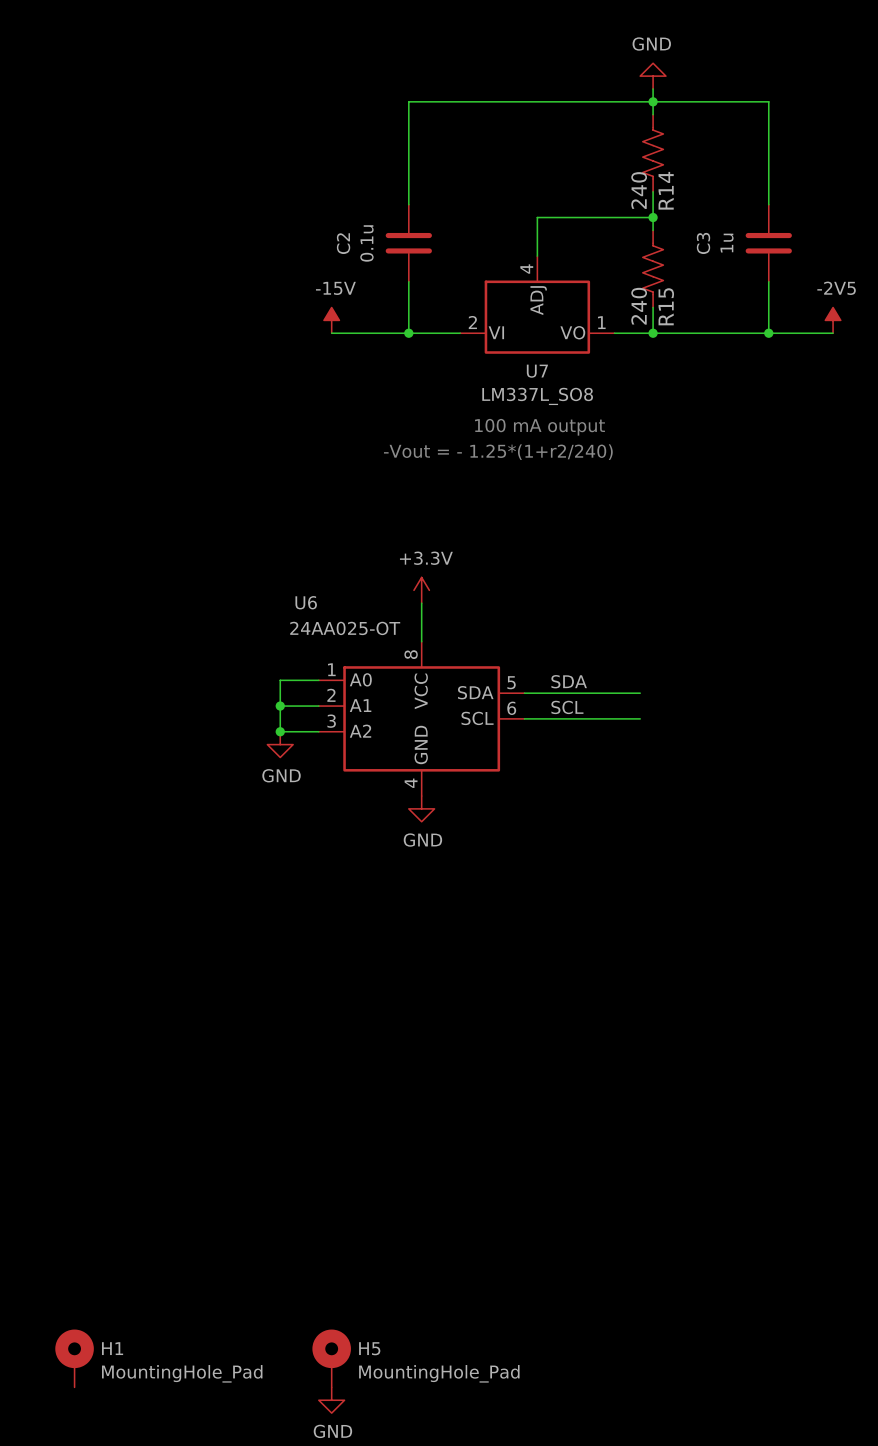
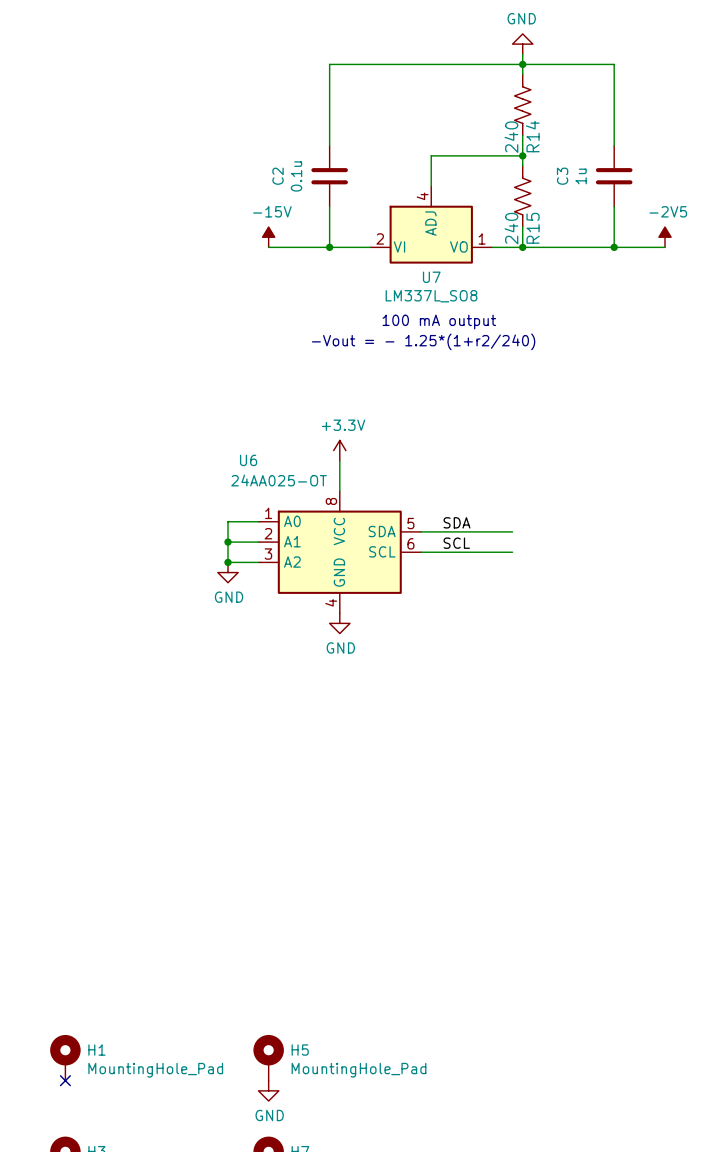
no-connect mark: none -> (65, 1080)

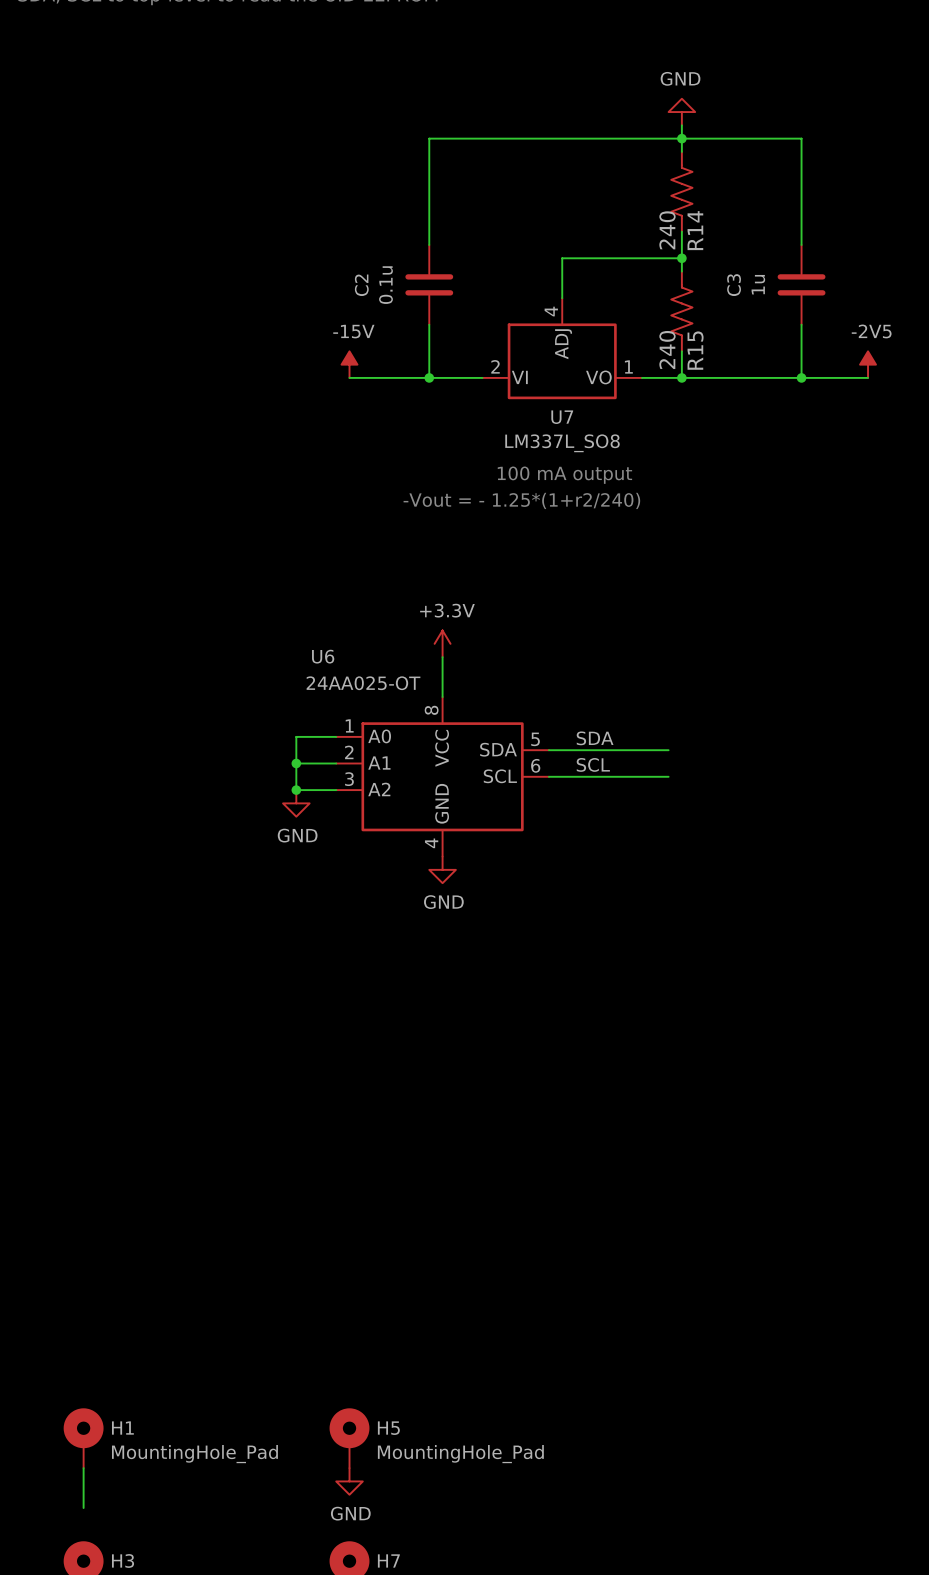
wire: none -> (83, 1468) (83, 1508)
no-connect mark: (65, 1080) -> none

